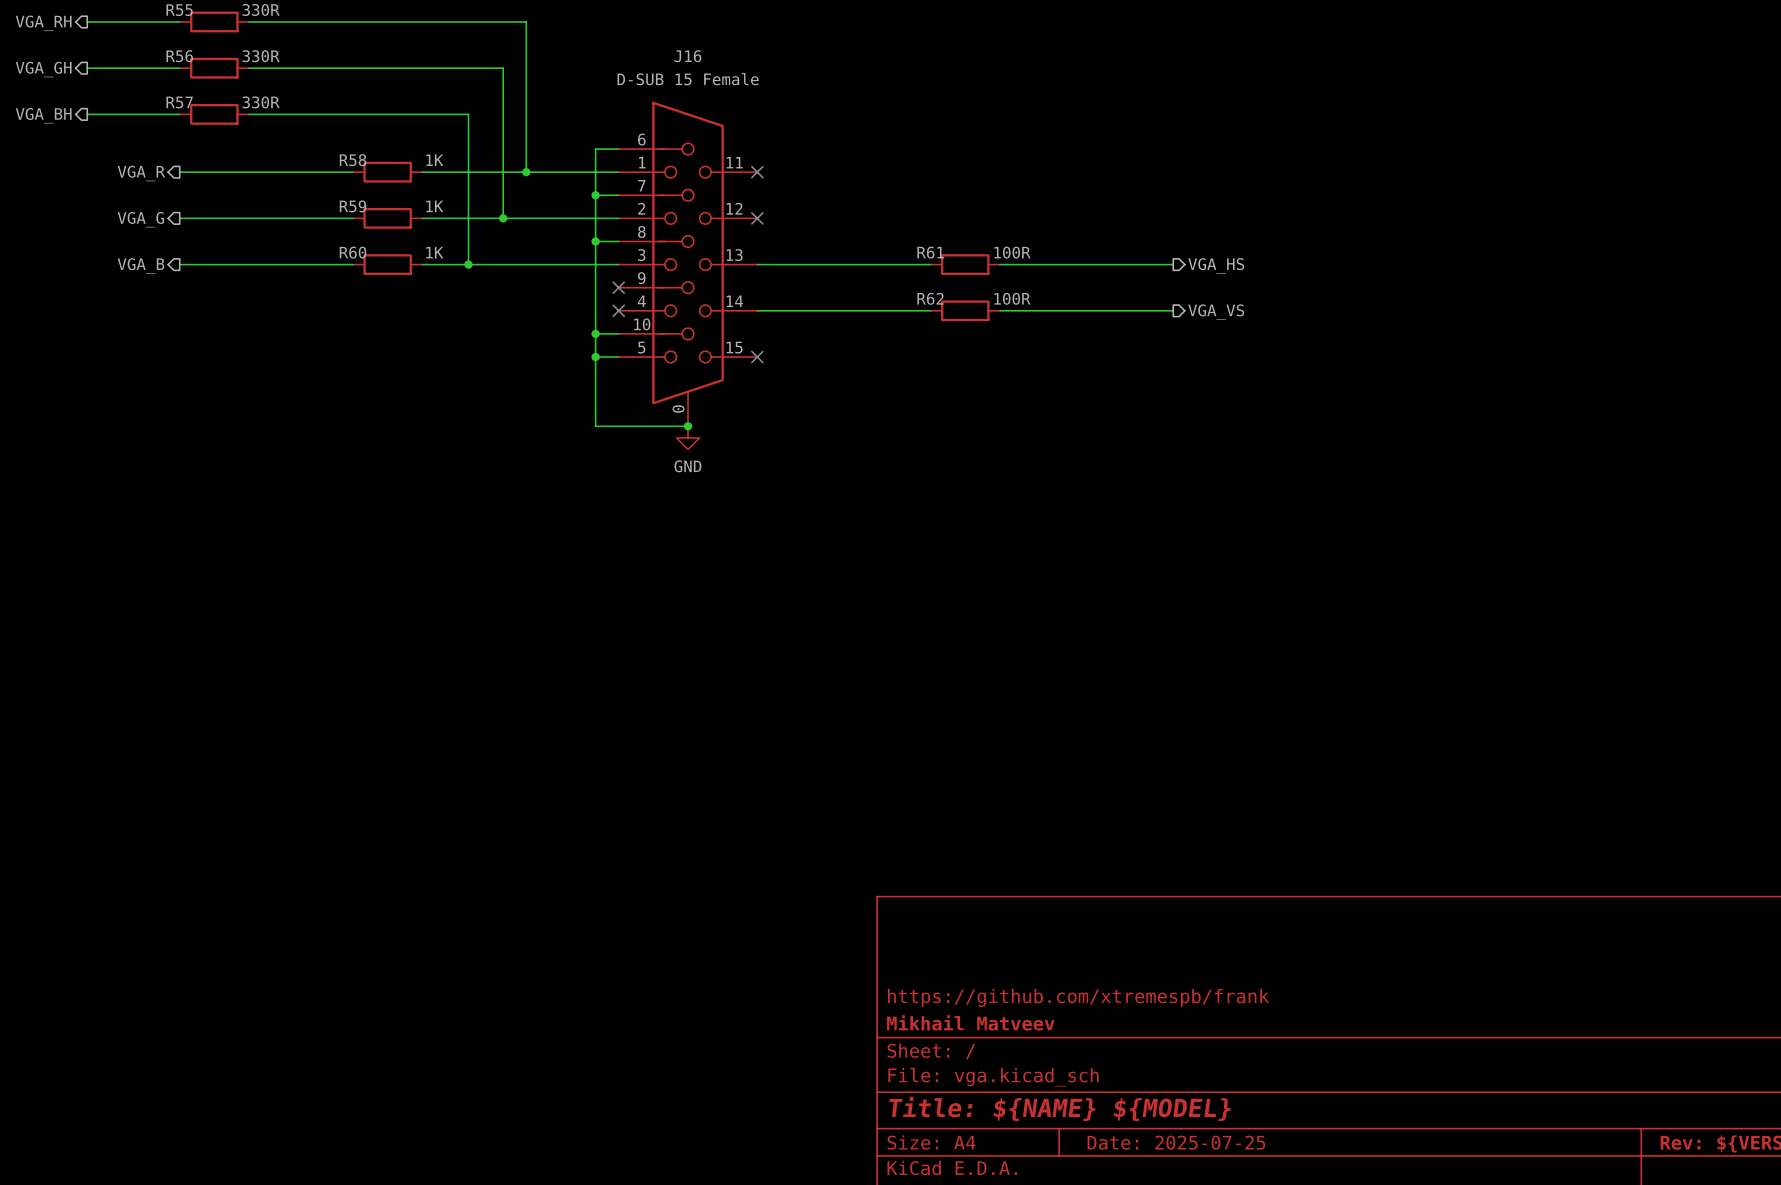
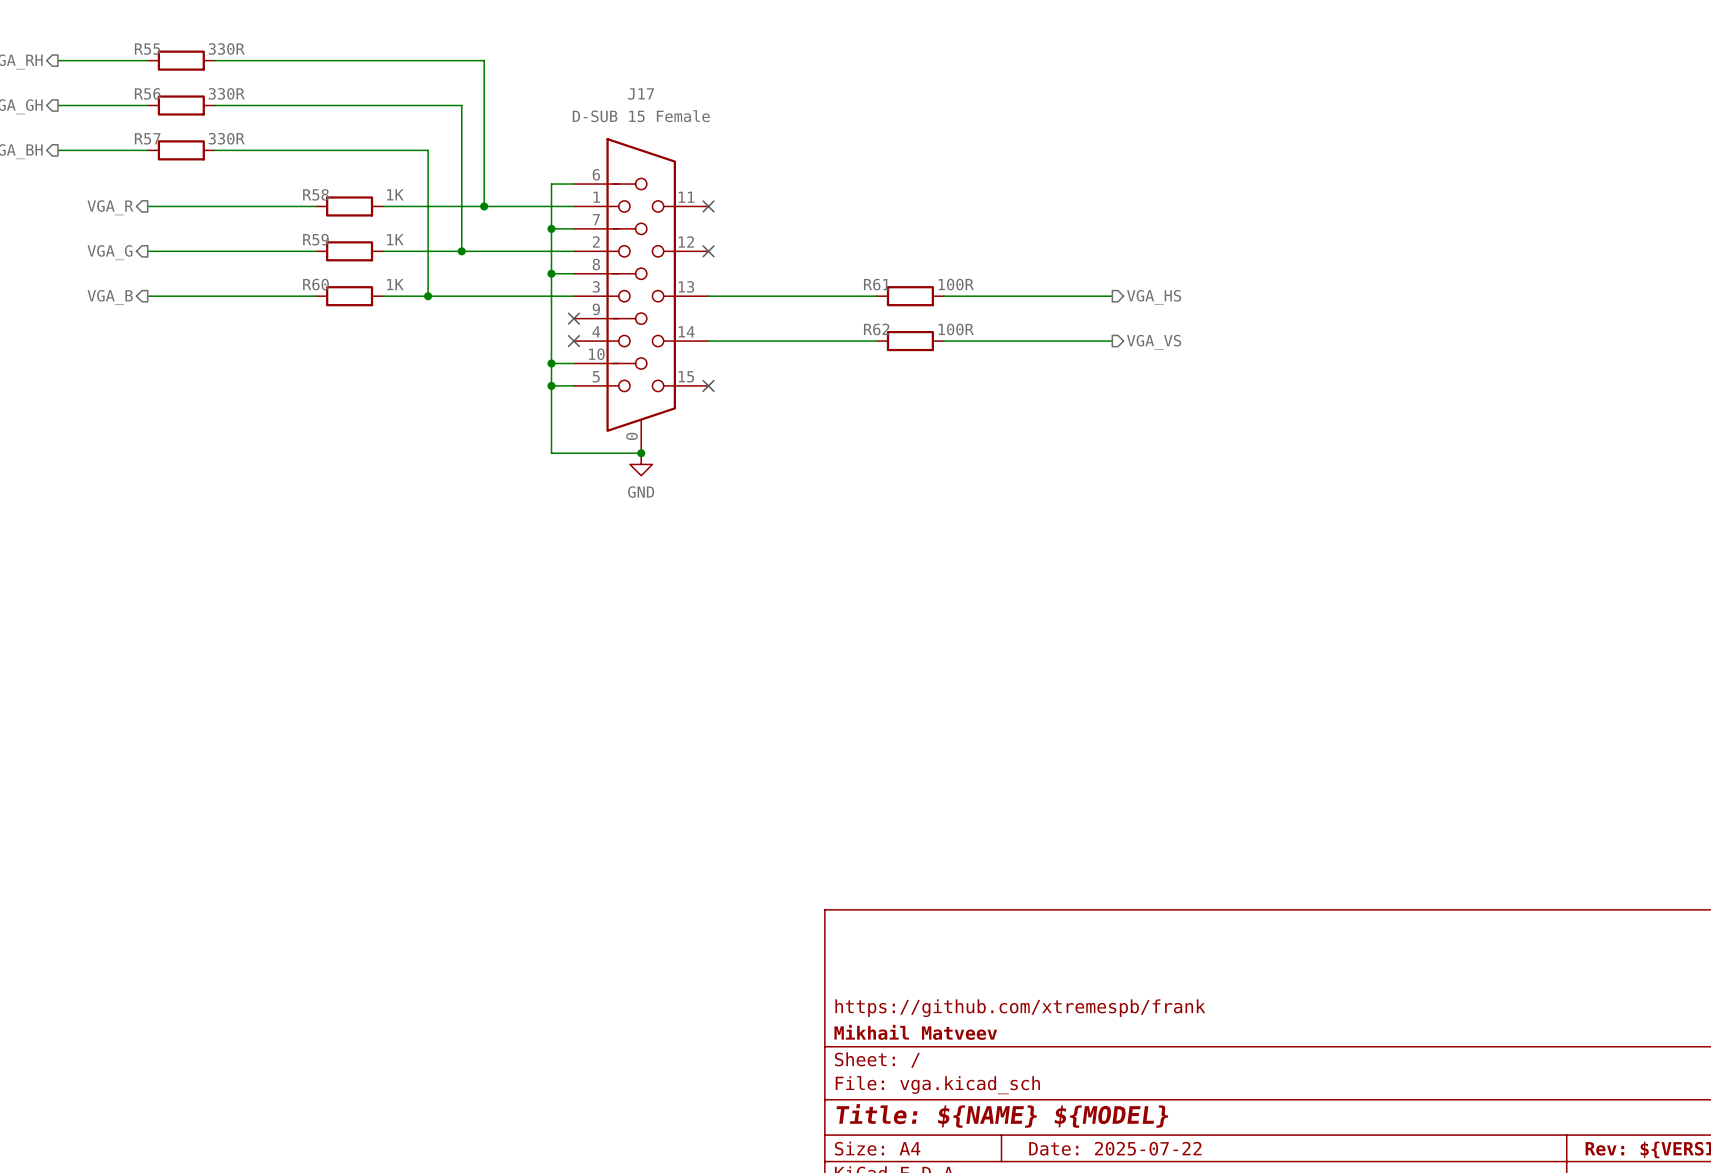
J16 name: J16 (687, 56) -> J17 (641, 93)
title block: Date: 2025-07-25 (1176, 1142) -> Date: 2025-07-22 (1115, 1148)

